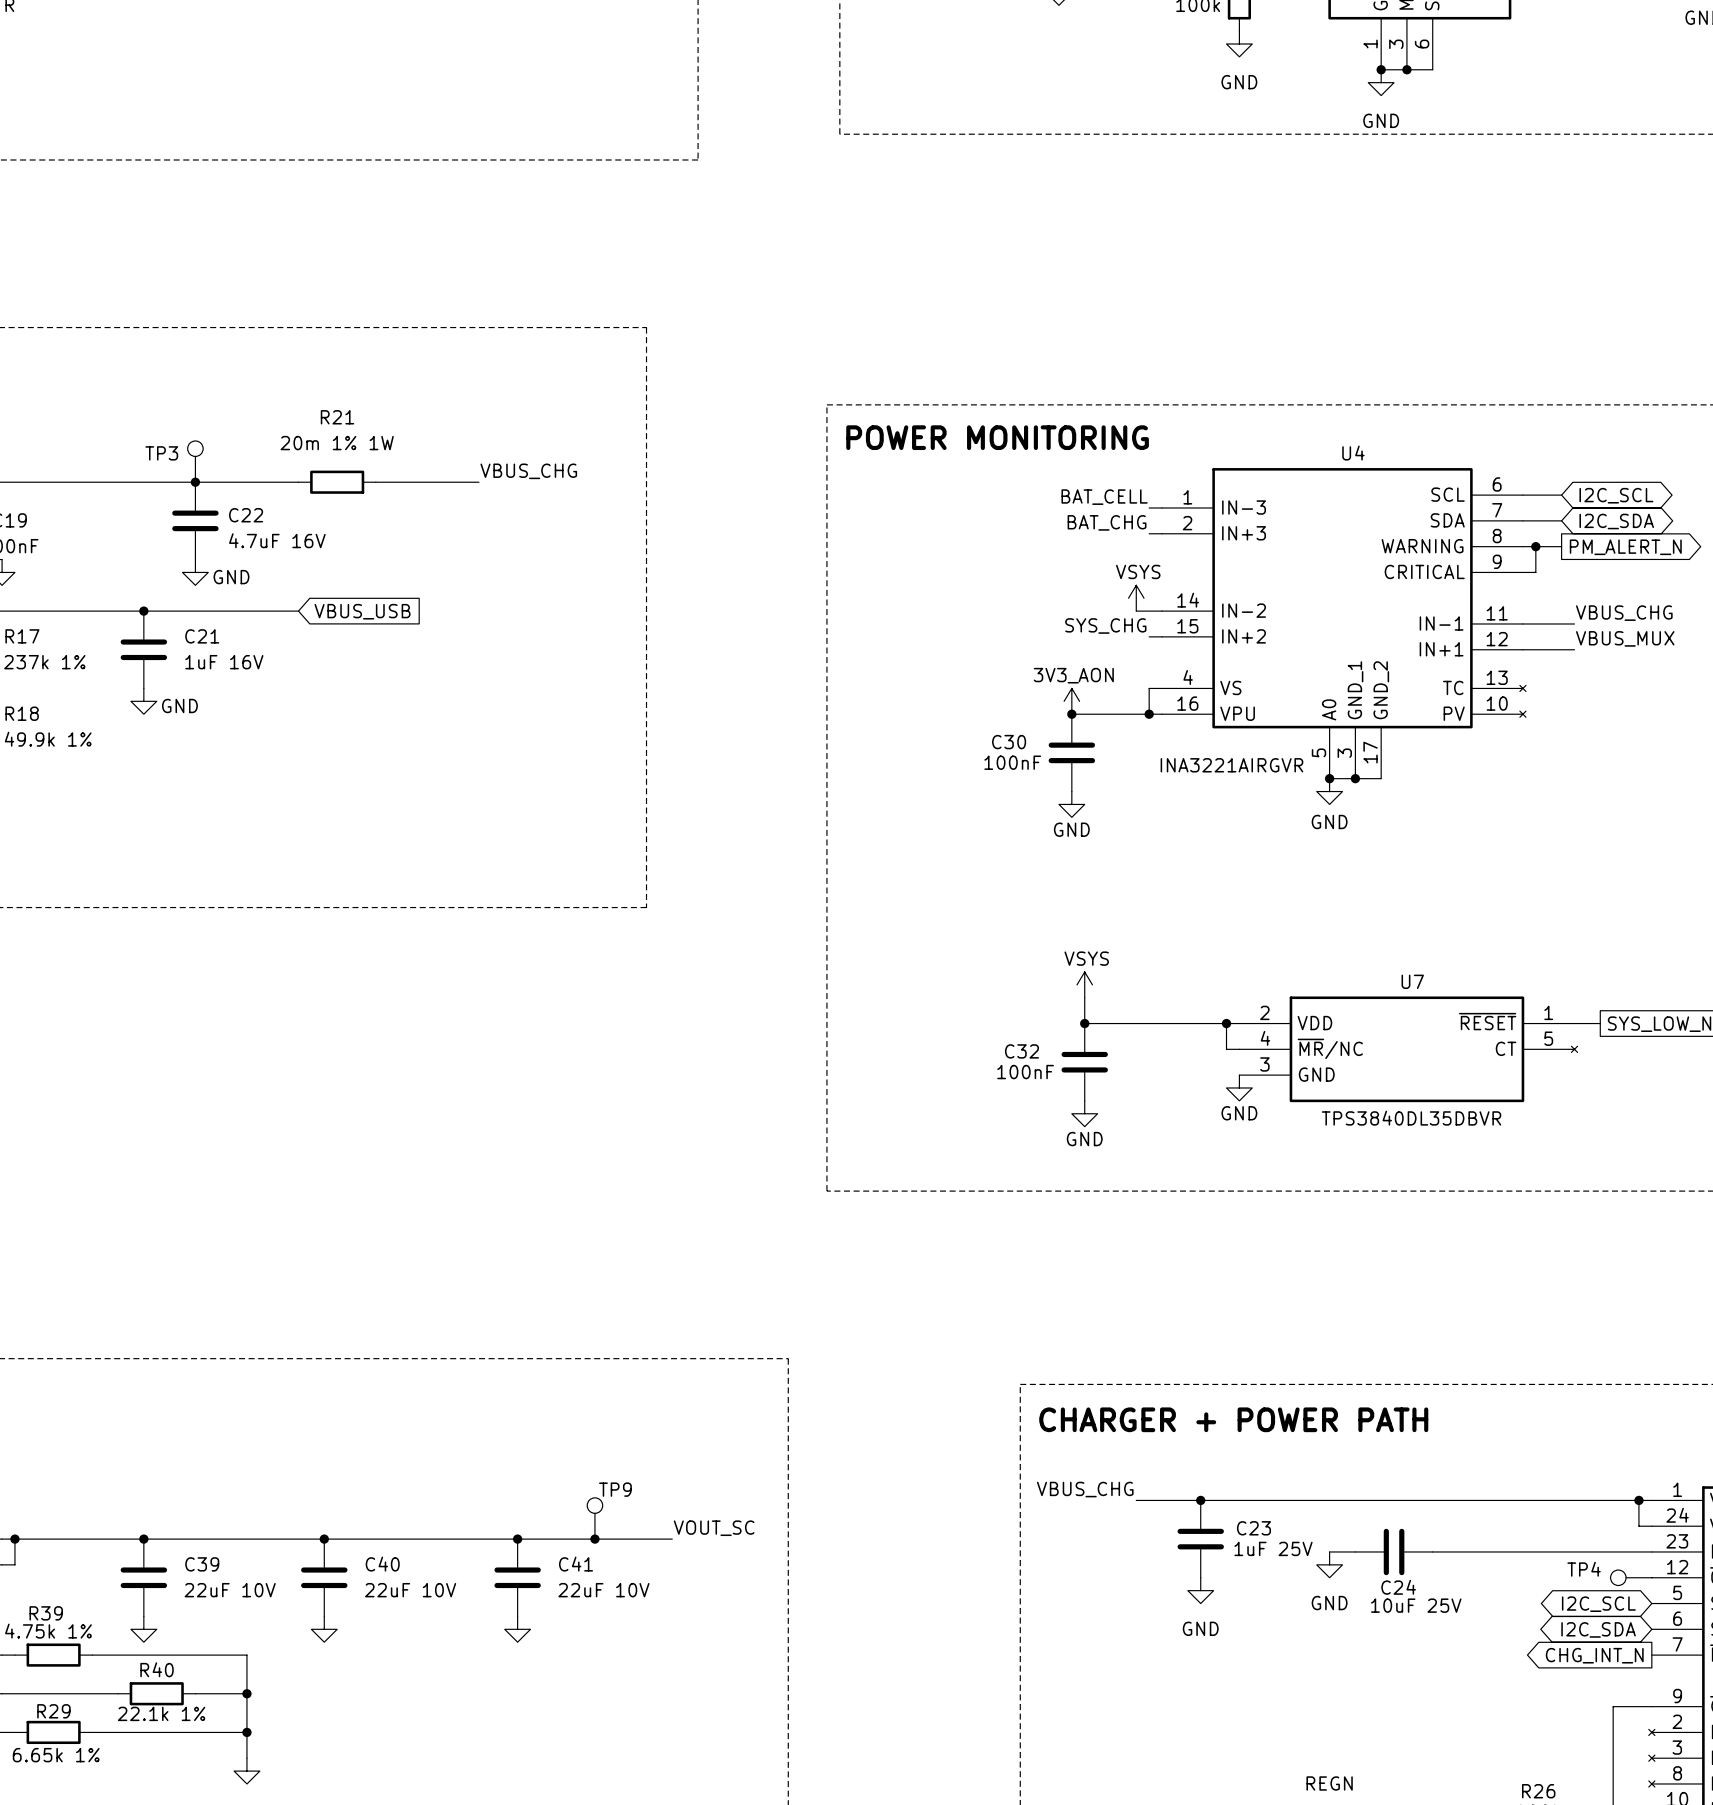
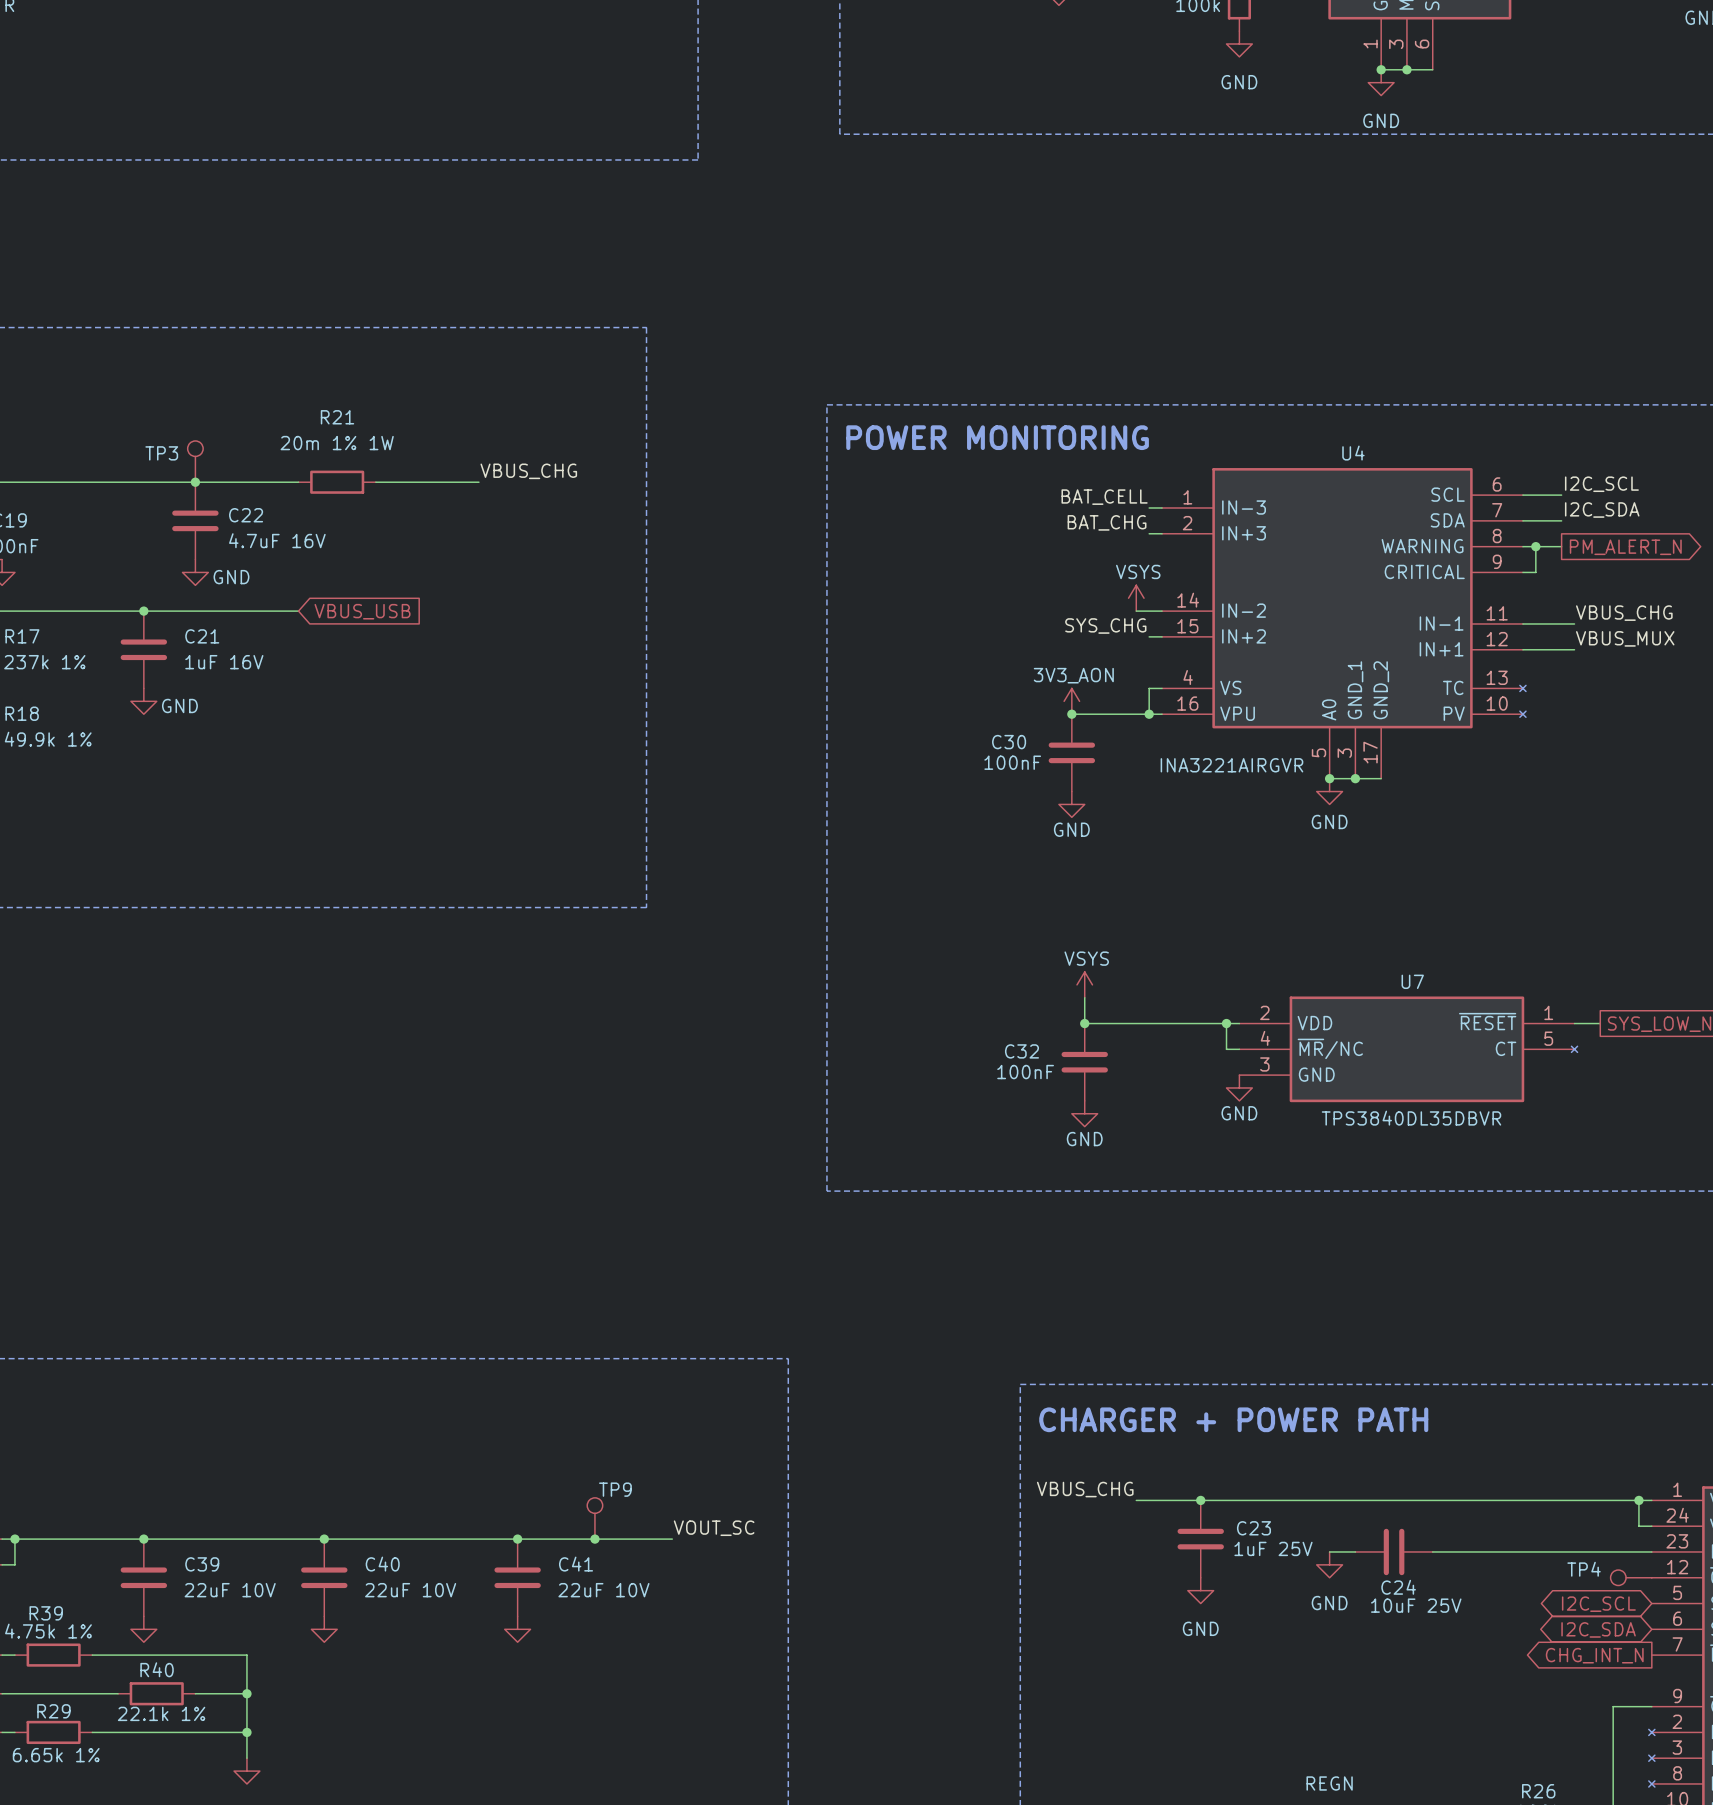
label: none -> I2C_SCL (1601, 484)
global label: I2C_SCL (1616, 495) -> none
label: none -> I2C_SDA (1602, 509)
global label: I2C_SDA (1616, 521) -> none

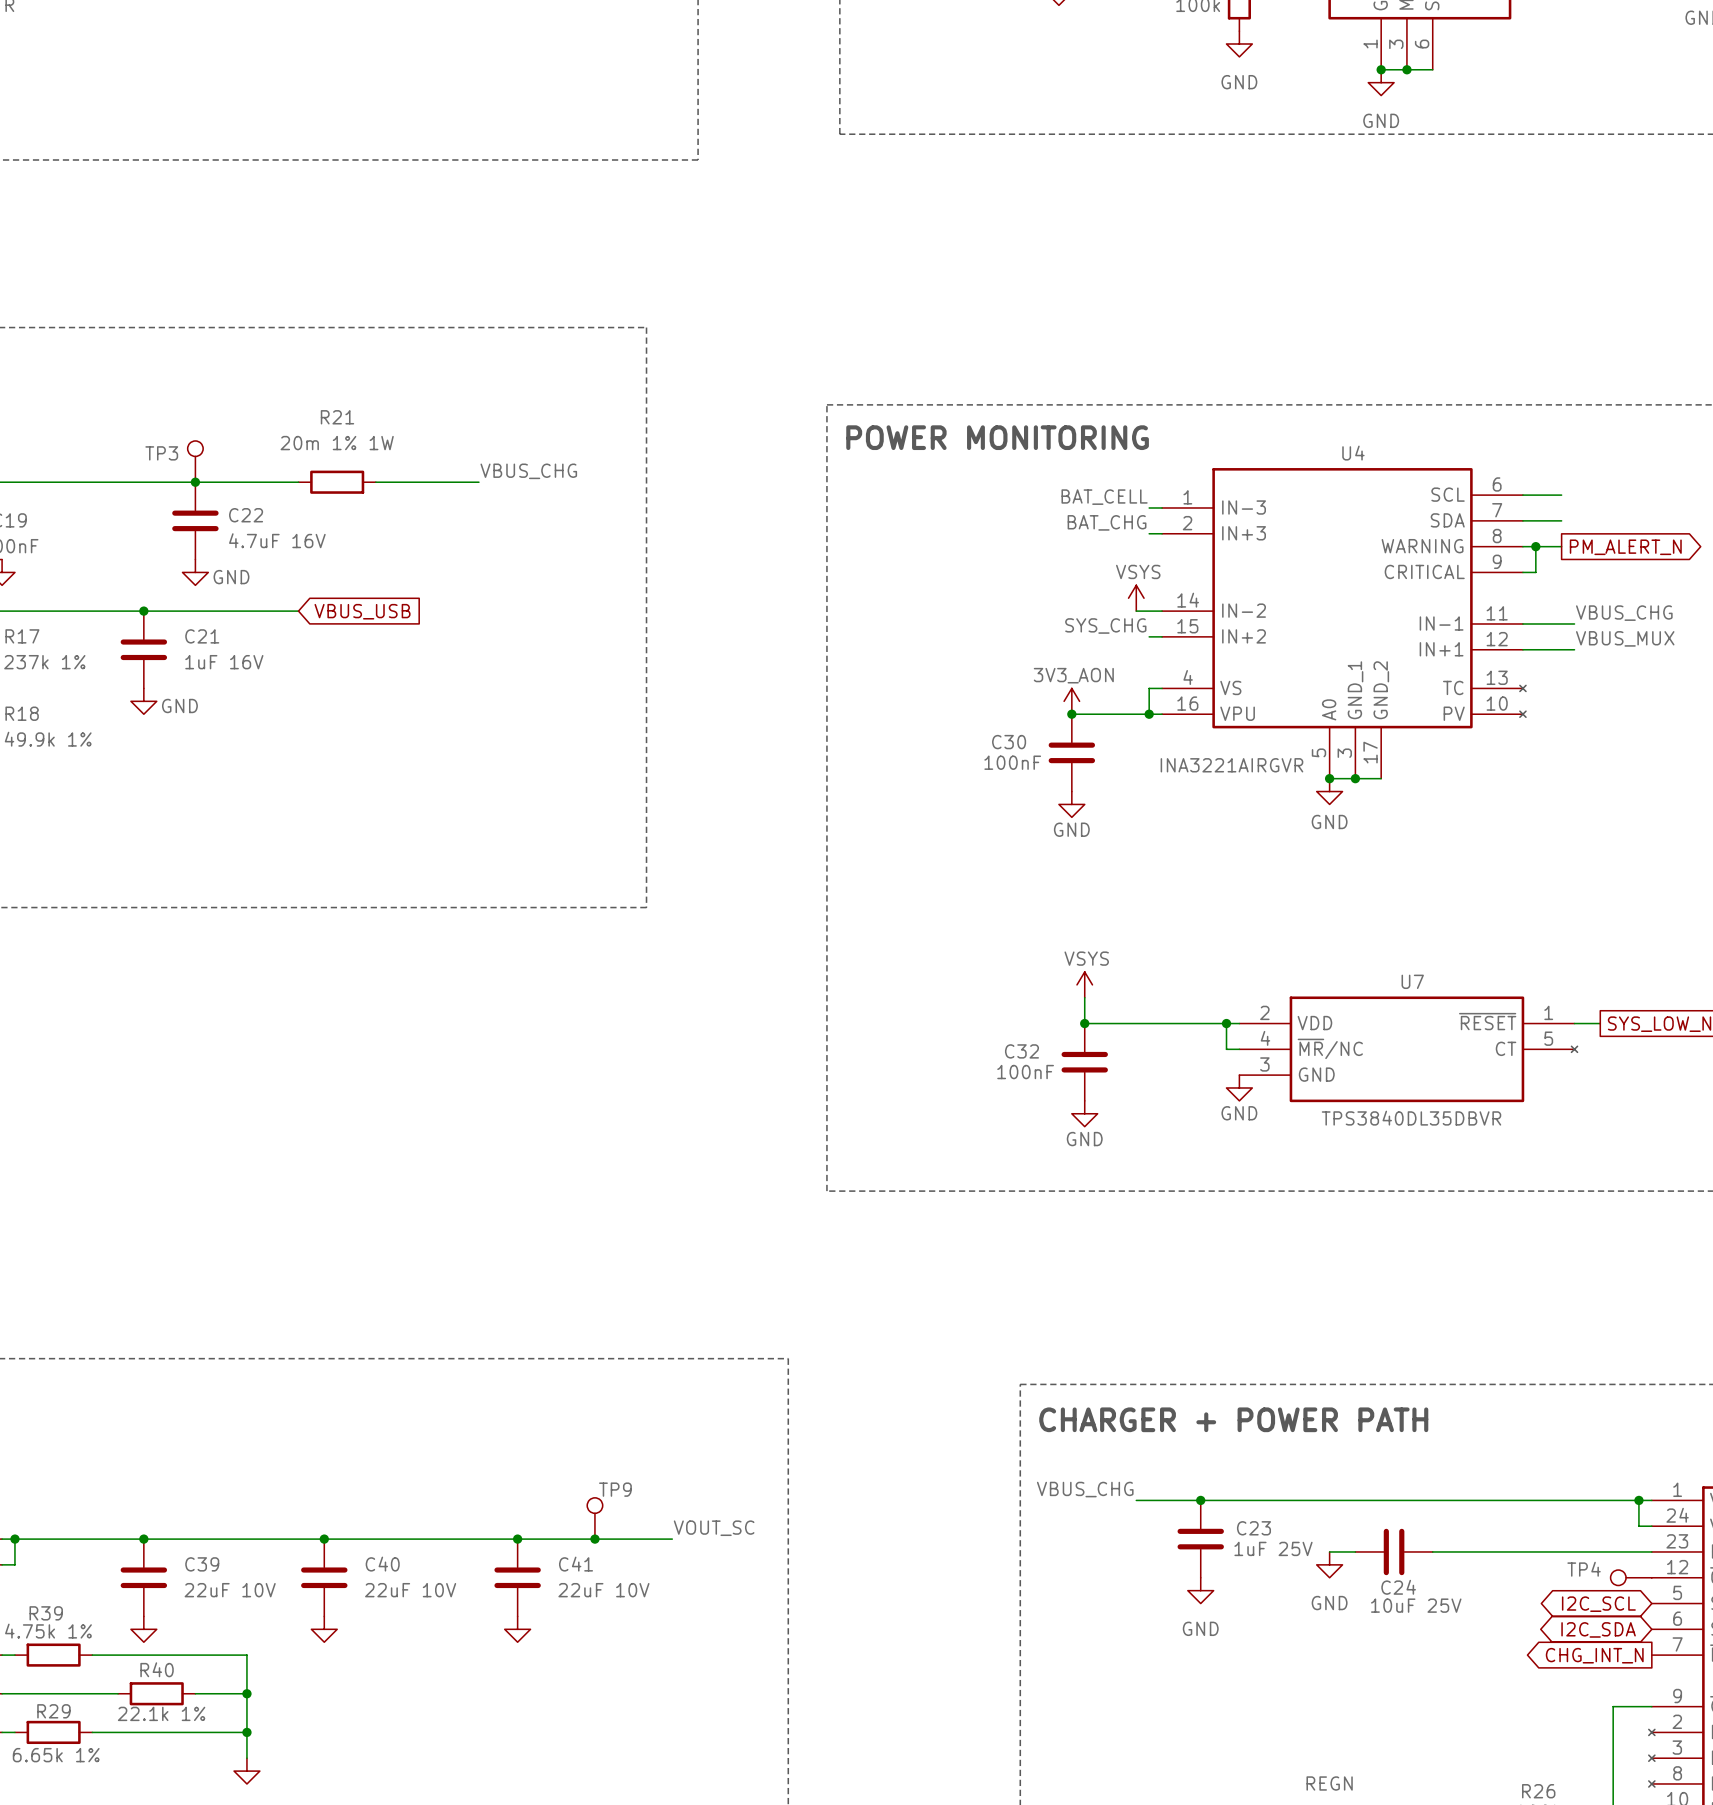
label: I2C_SCL (1601, 484) -> none
label: I2C_SDA (1602, 509) -> none

